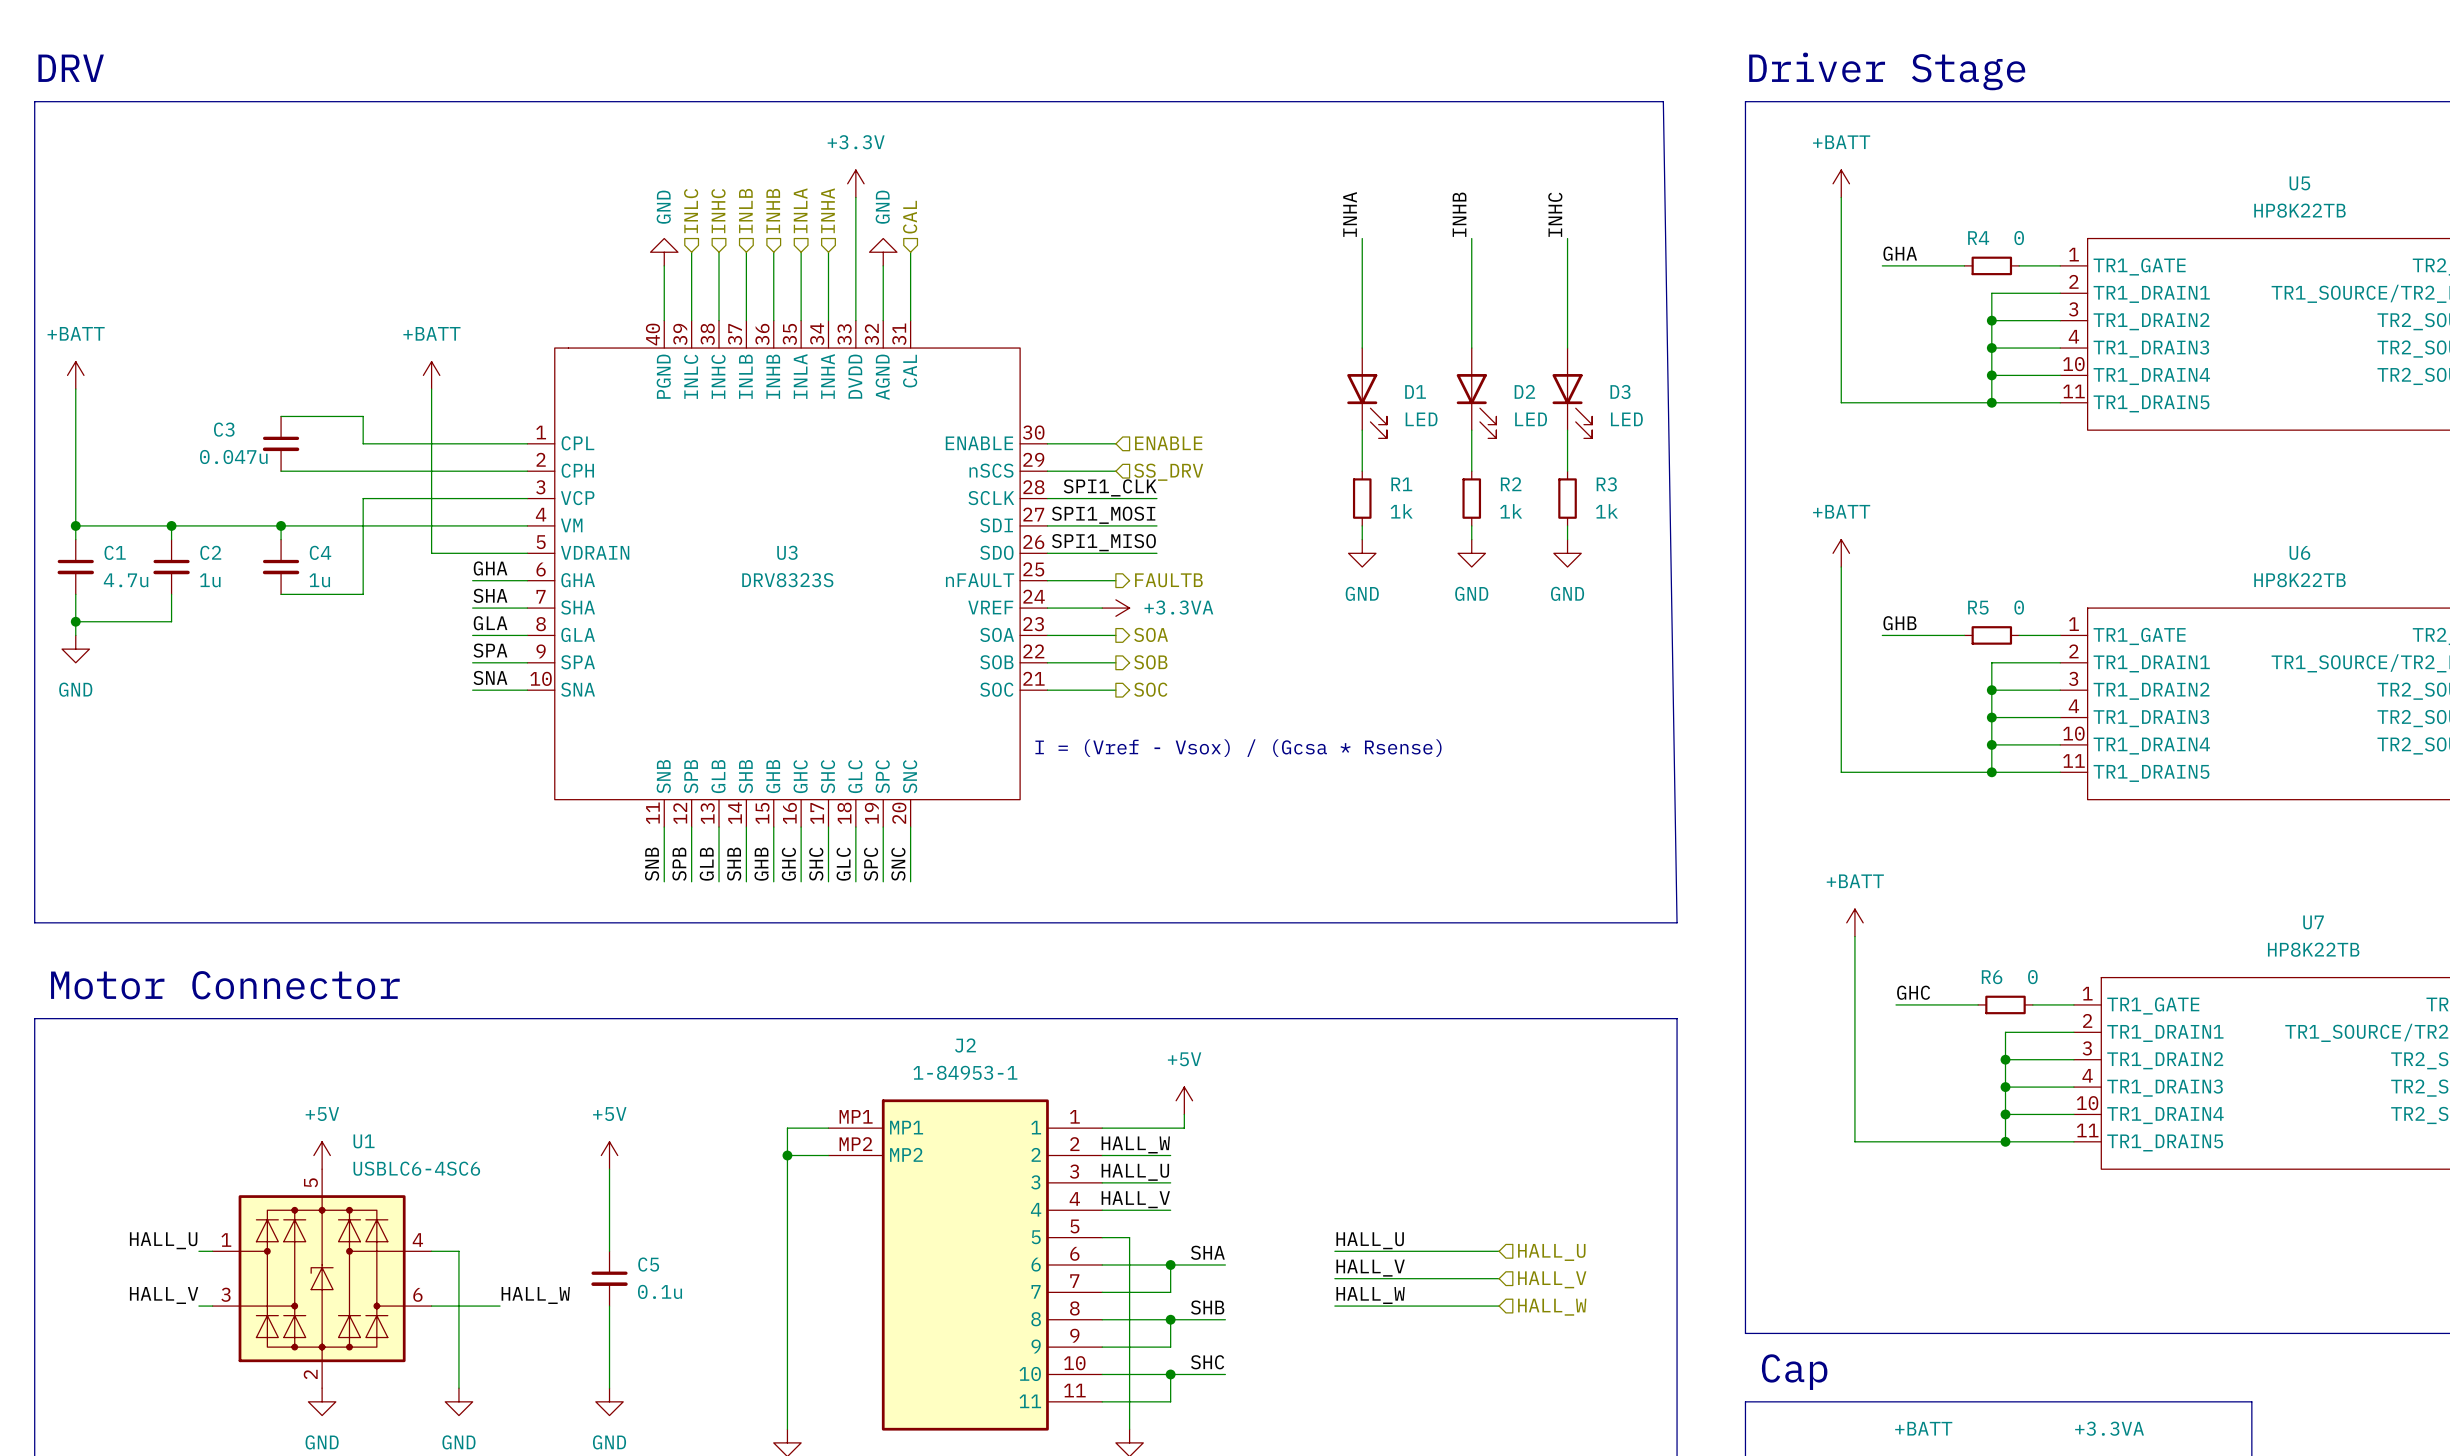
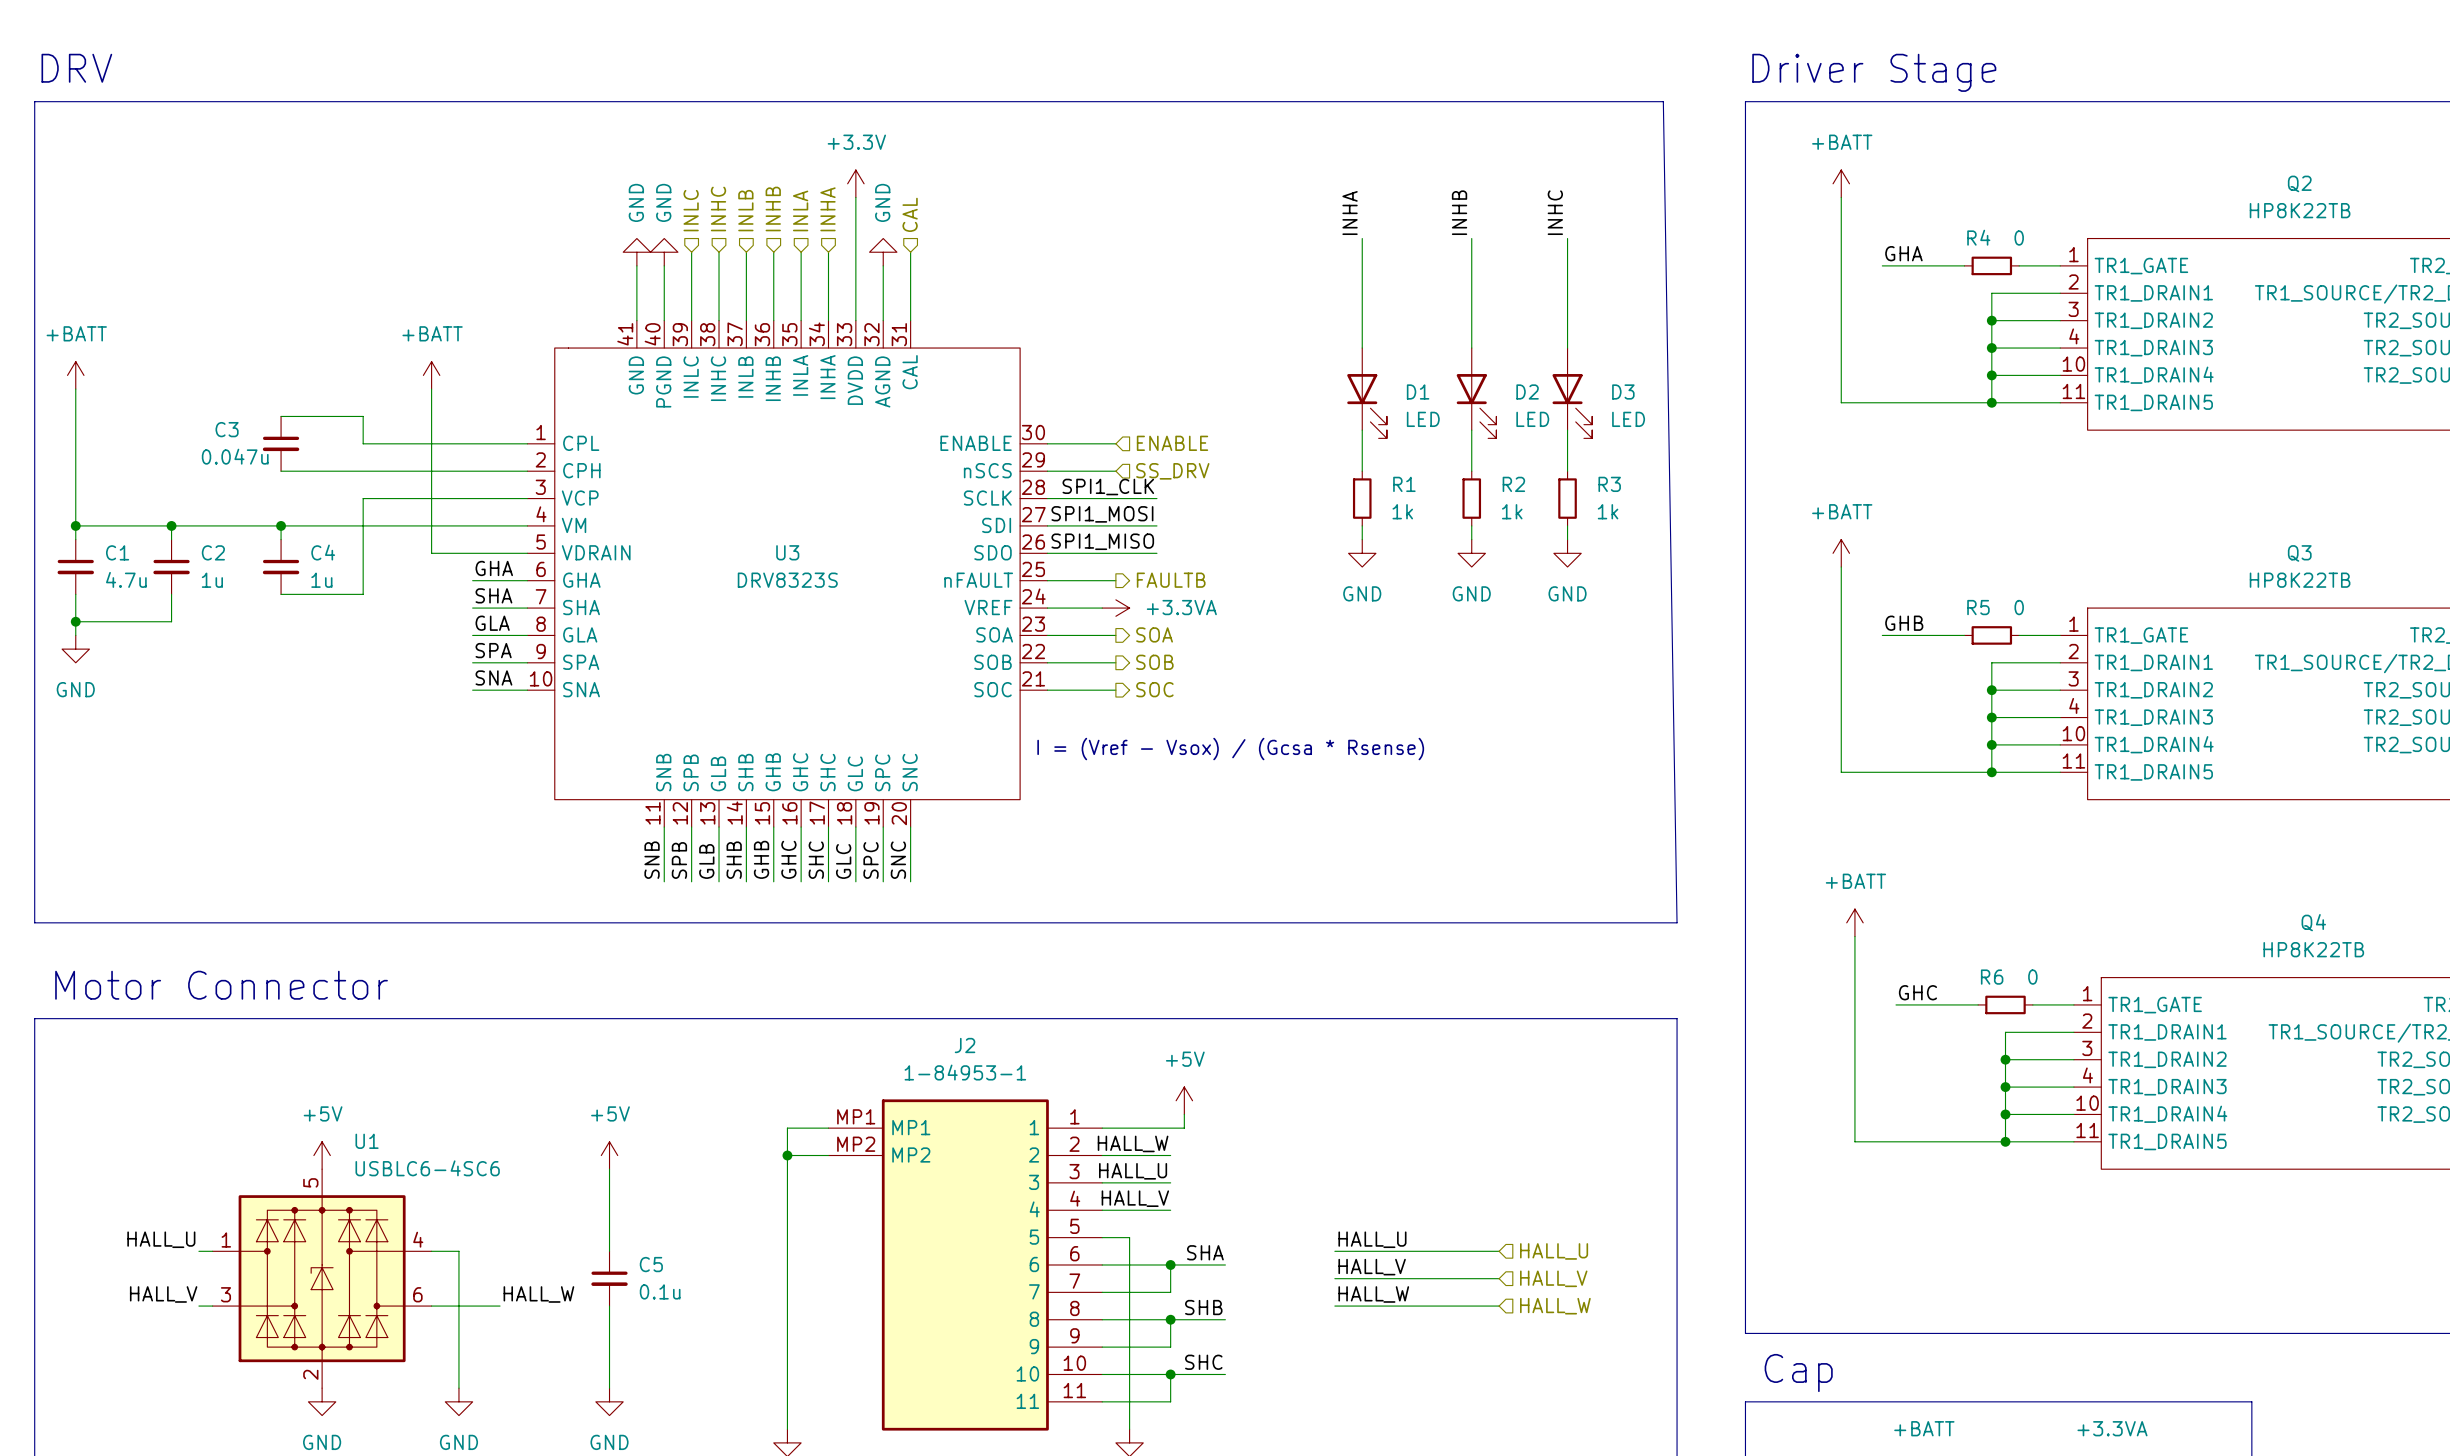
U5 name: U5 (2299, 183) -> Q2 (2299, 183)
power symbol: none -> GND (636, 252)
wire: none -> (636, 265) (636, 320)
U3 symbol: [527, 320, 1048, 828] -> [527, 320, 1048, 828]
U6 name: U6 (2299, 552) -> Q3 (2299, 553)
U7 name: U7 (2313, 922) -> Q4 (2313, 922)

